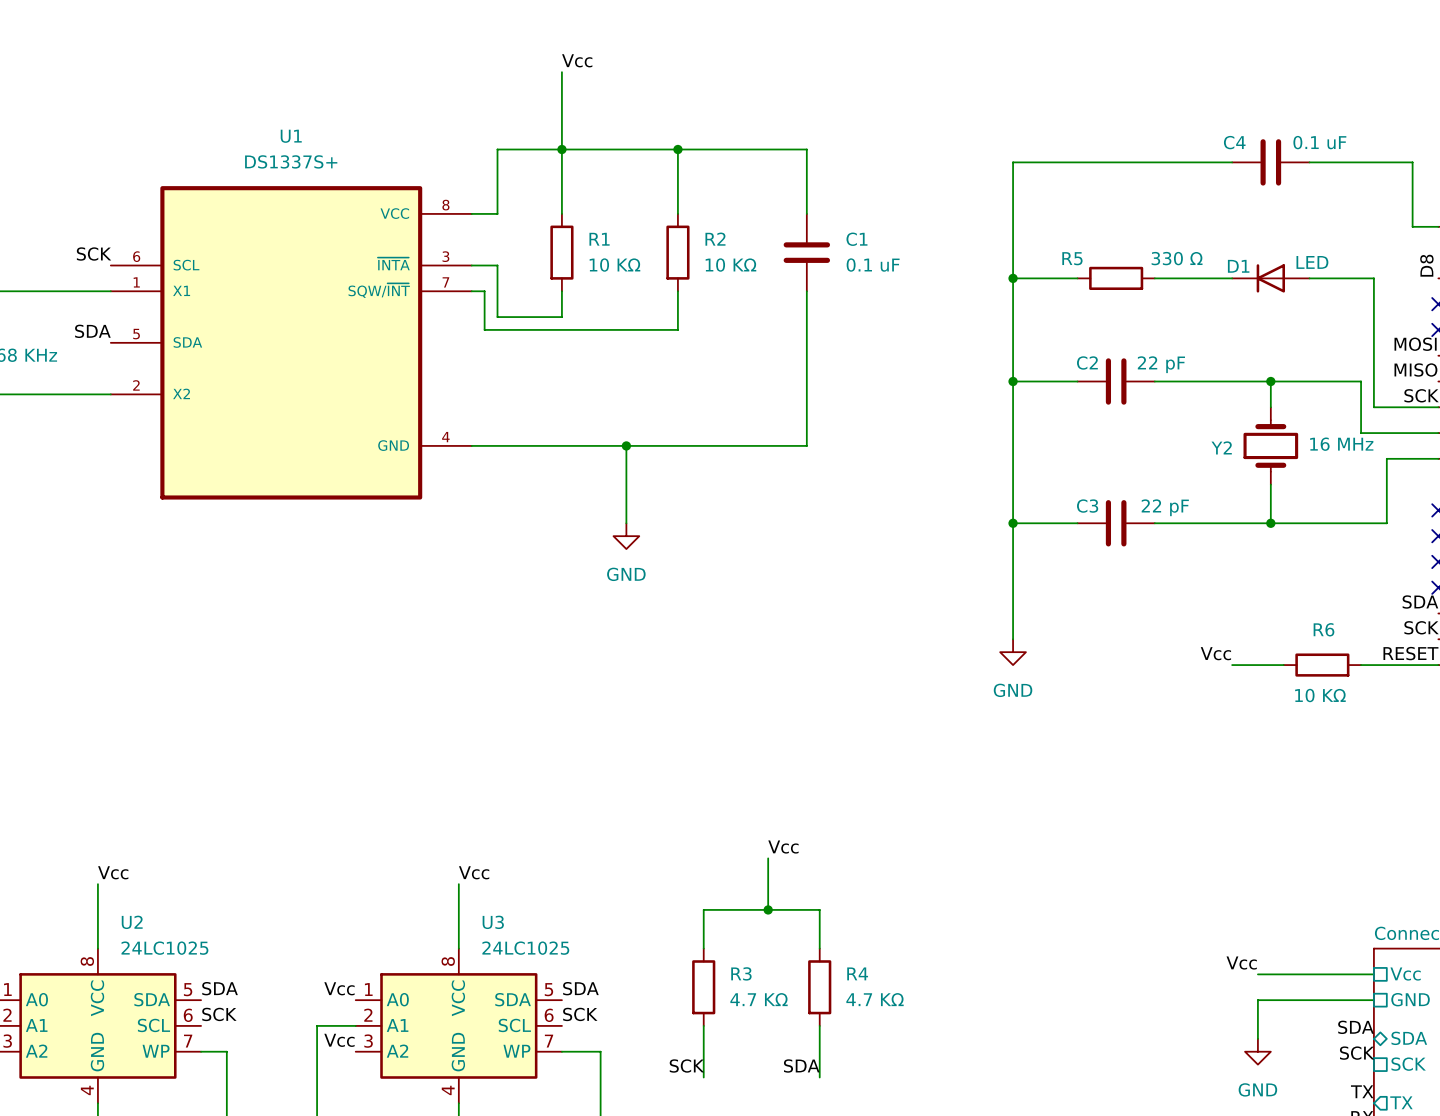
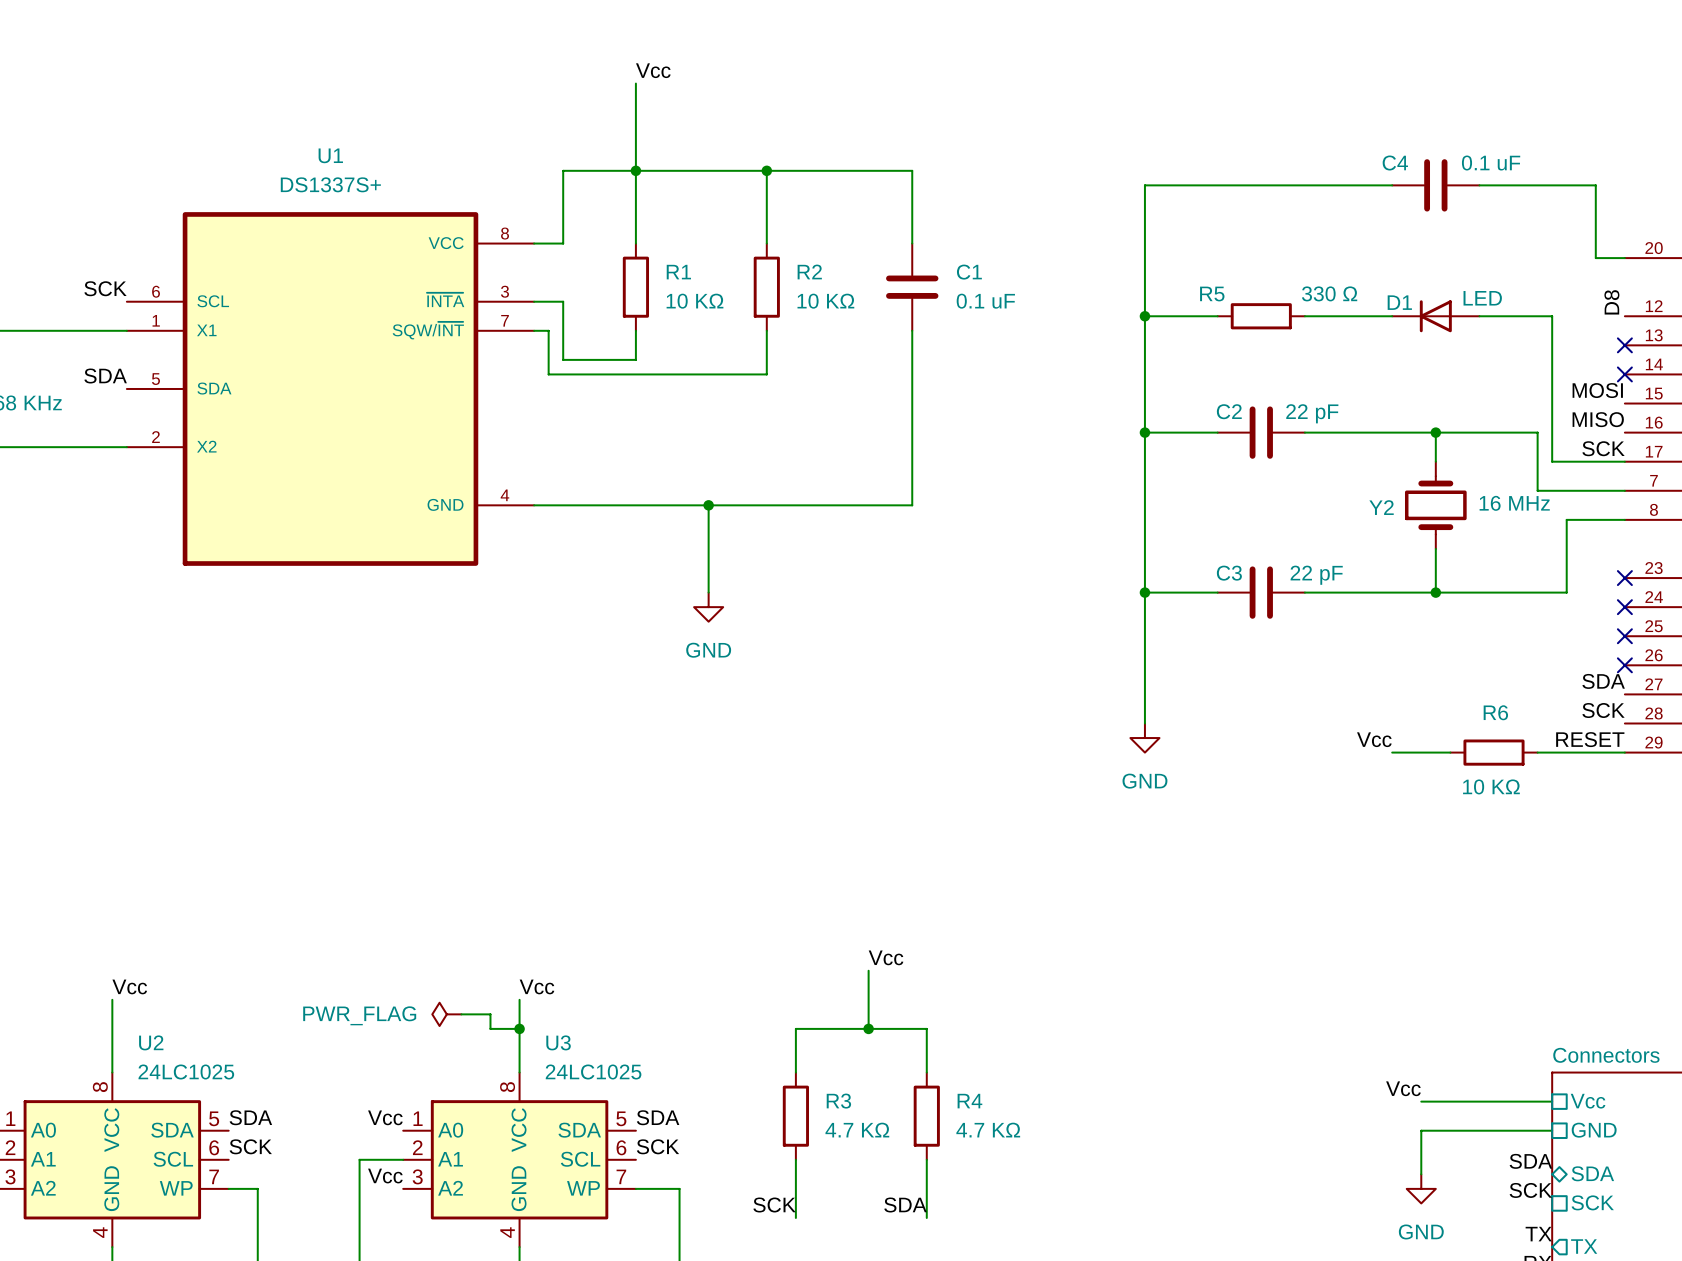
power symbol: none -> PWR_FLAG (446, 1014)
wire: none -> (461, 1014) (490, 1014) (490, 1028) (519, 1028)
junction: none -> (519, 1028)

